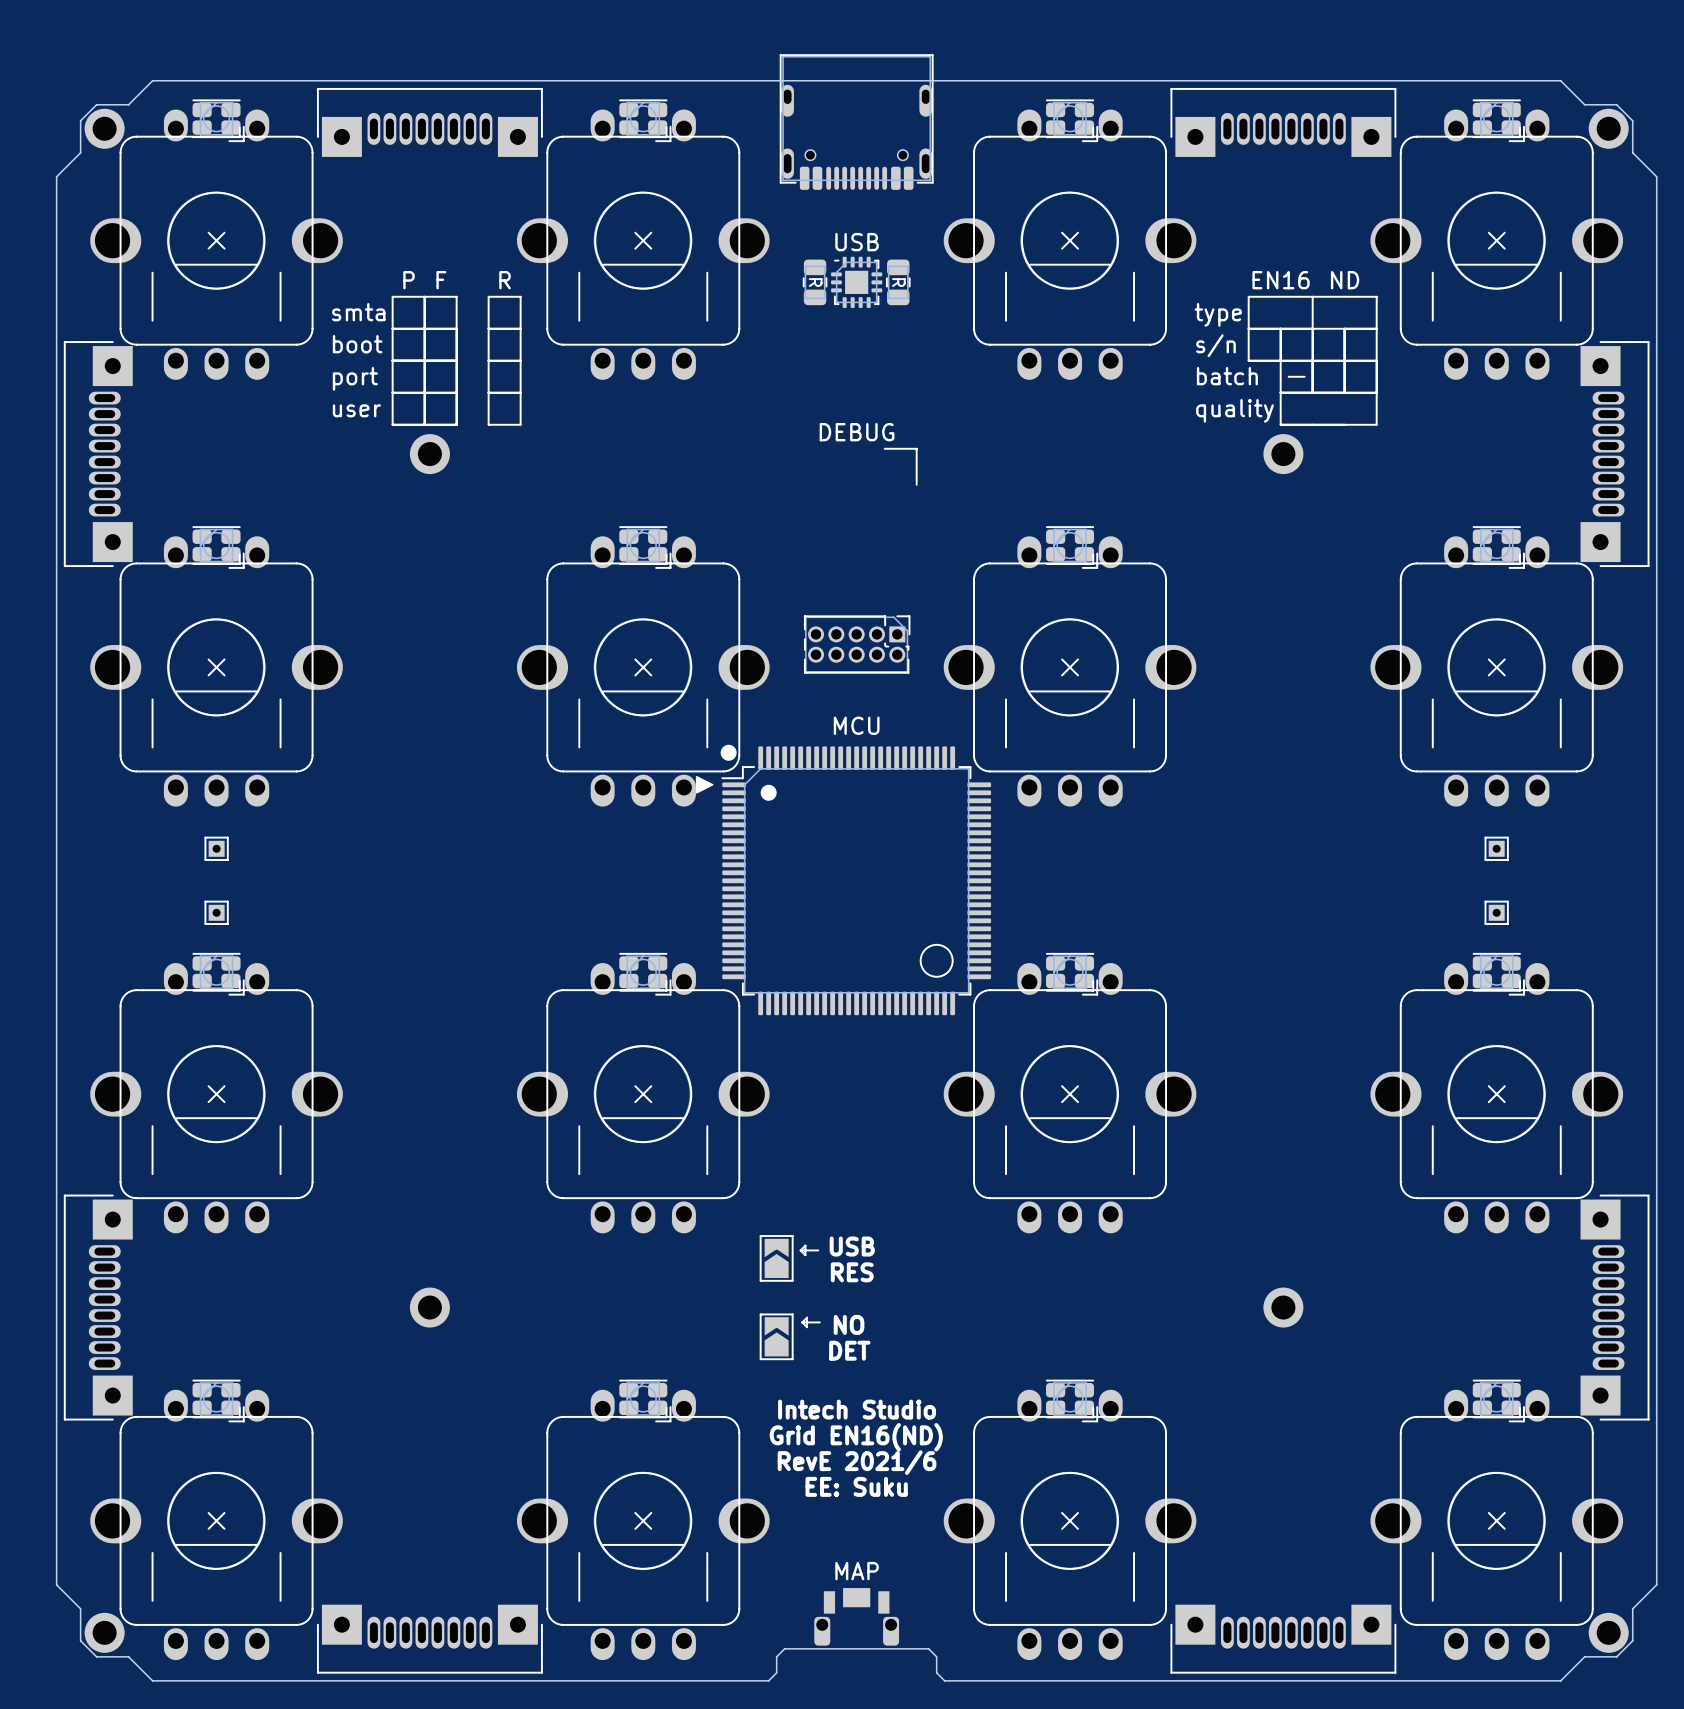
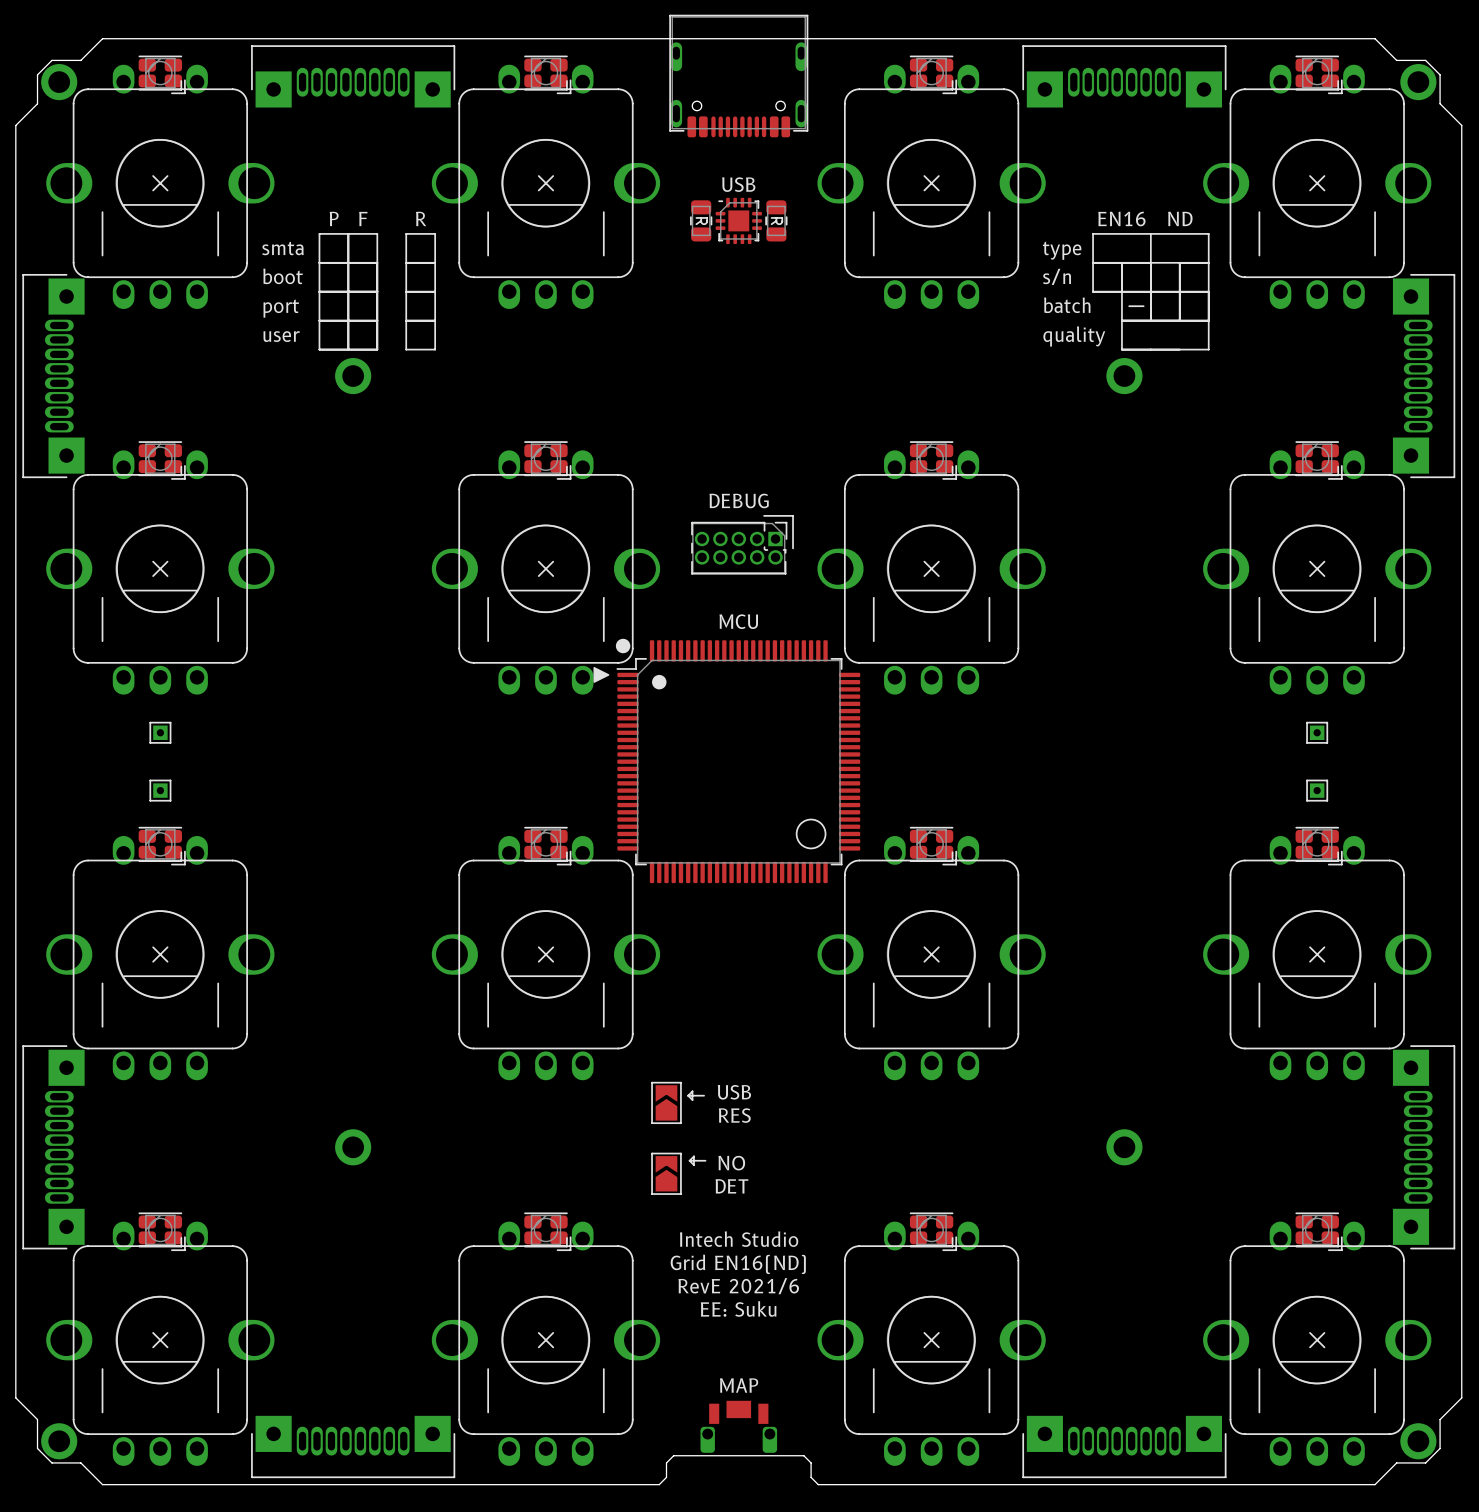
text position: DEBUG (857, 432) -> DEBUG (739, 500)
line: (884, 448) (916, 448) (916, 484) -> (764, 515) (793, 515) (793, 548)

